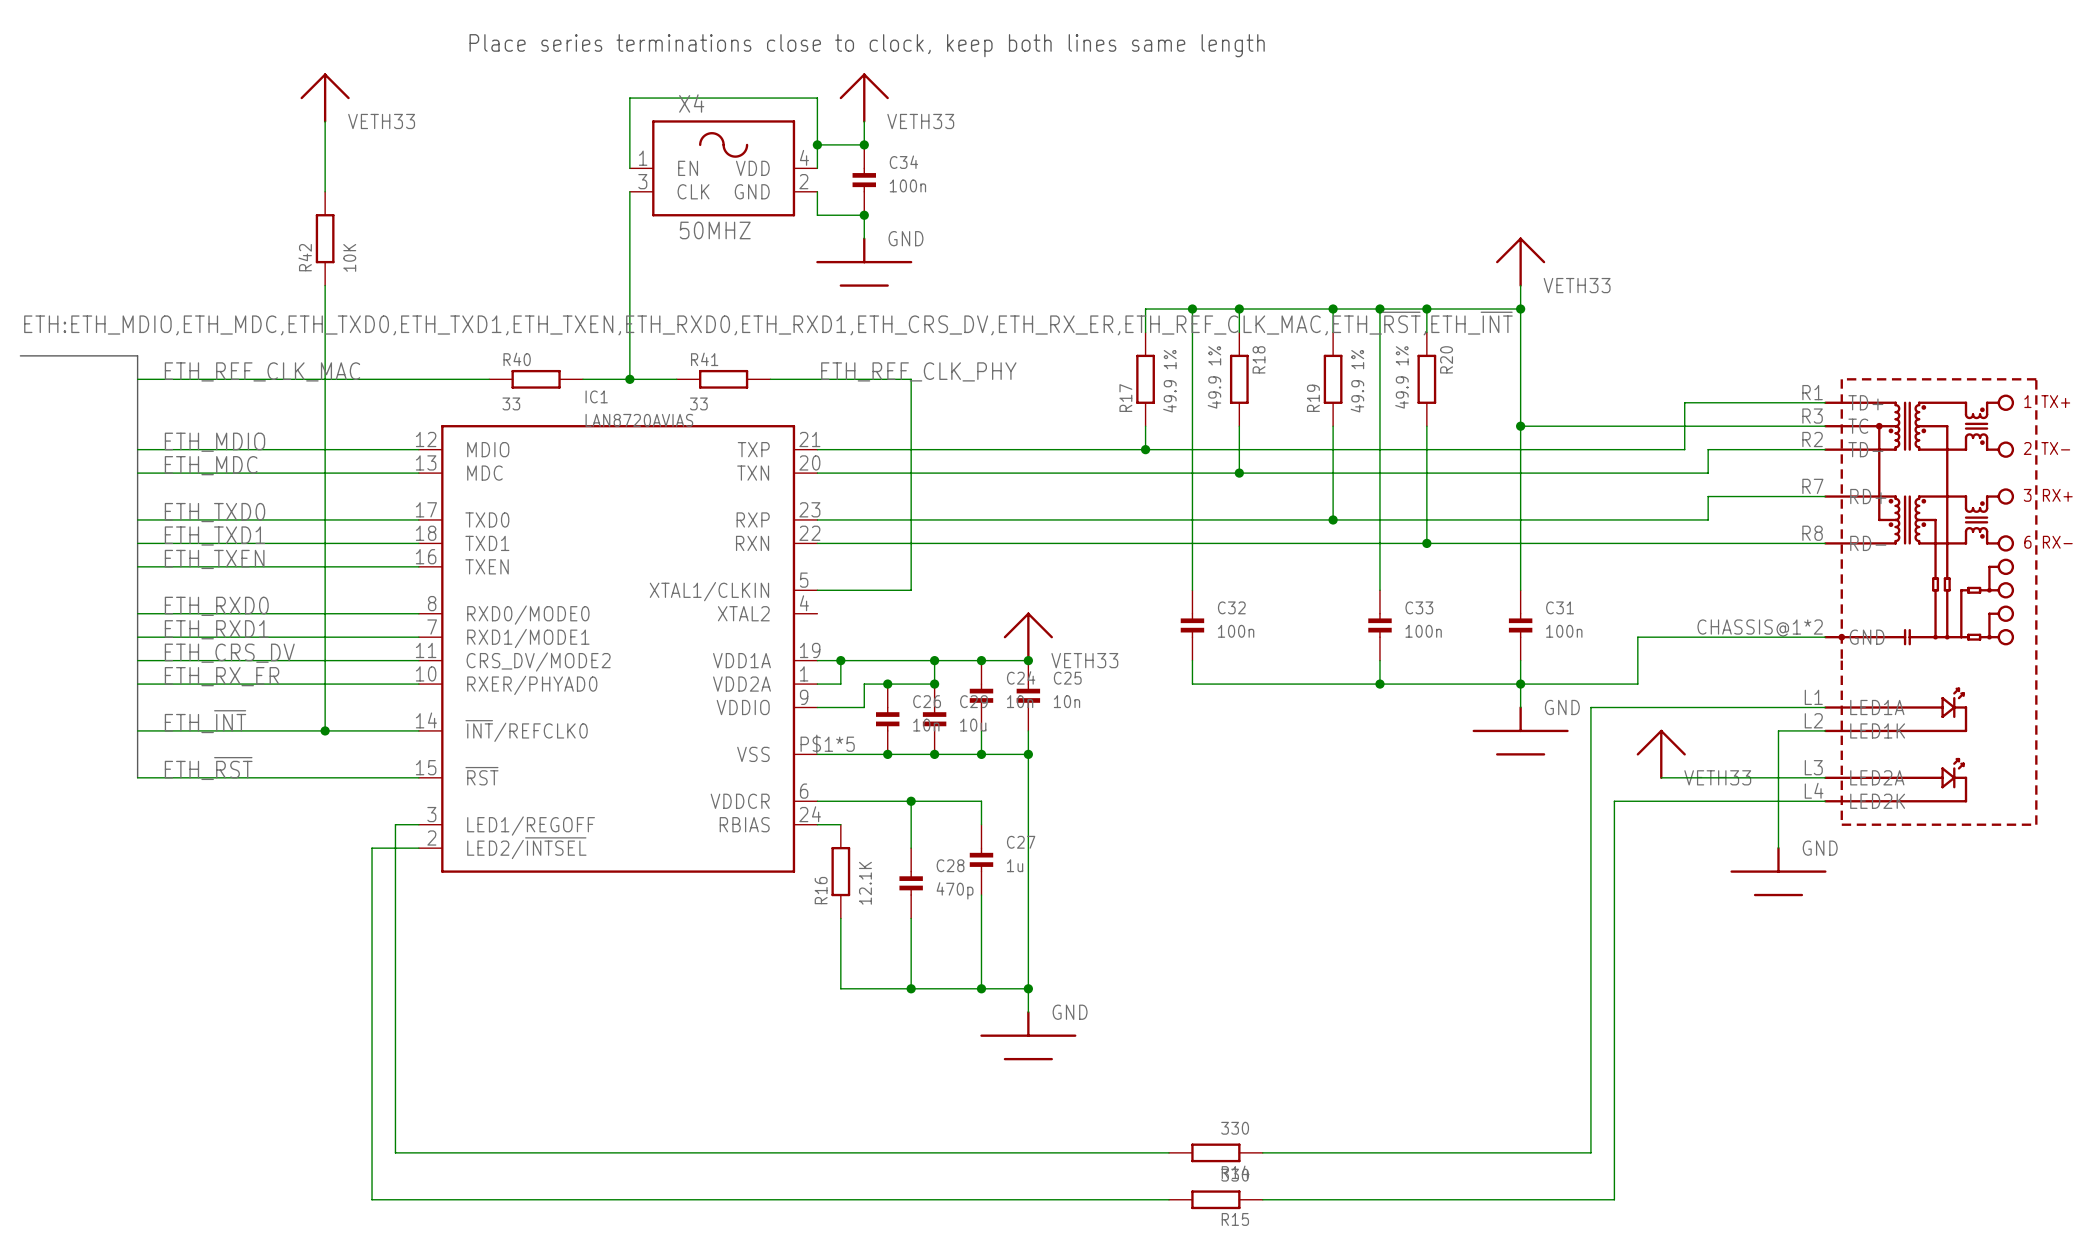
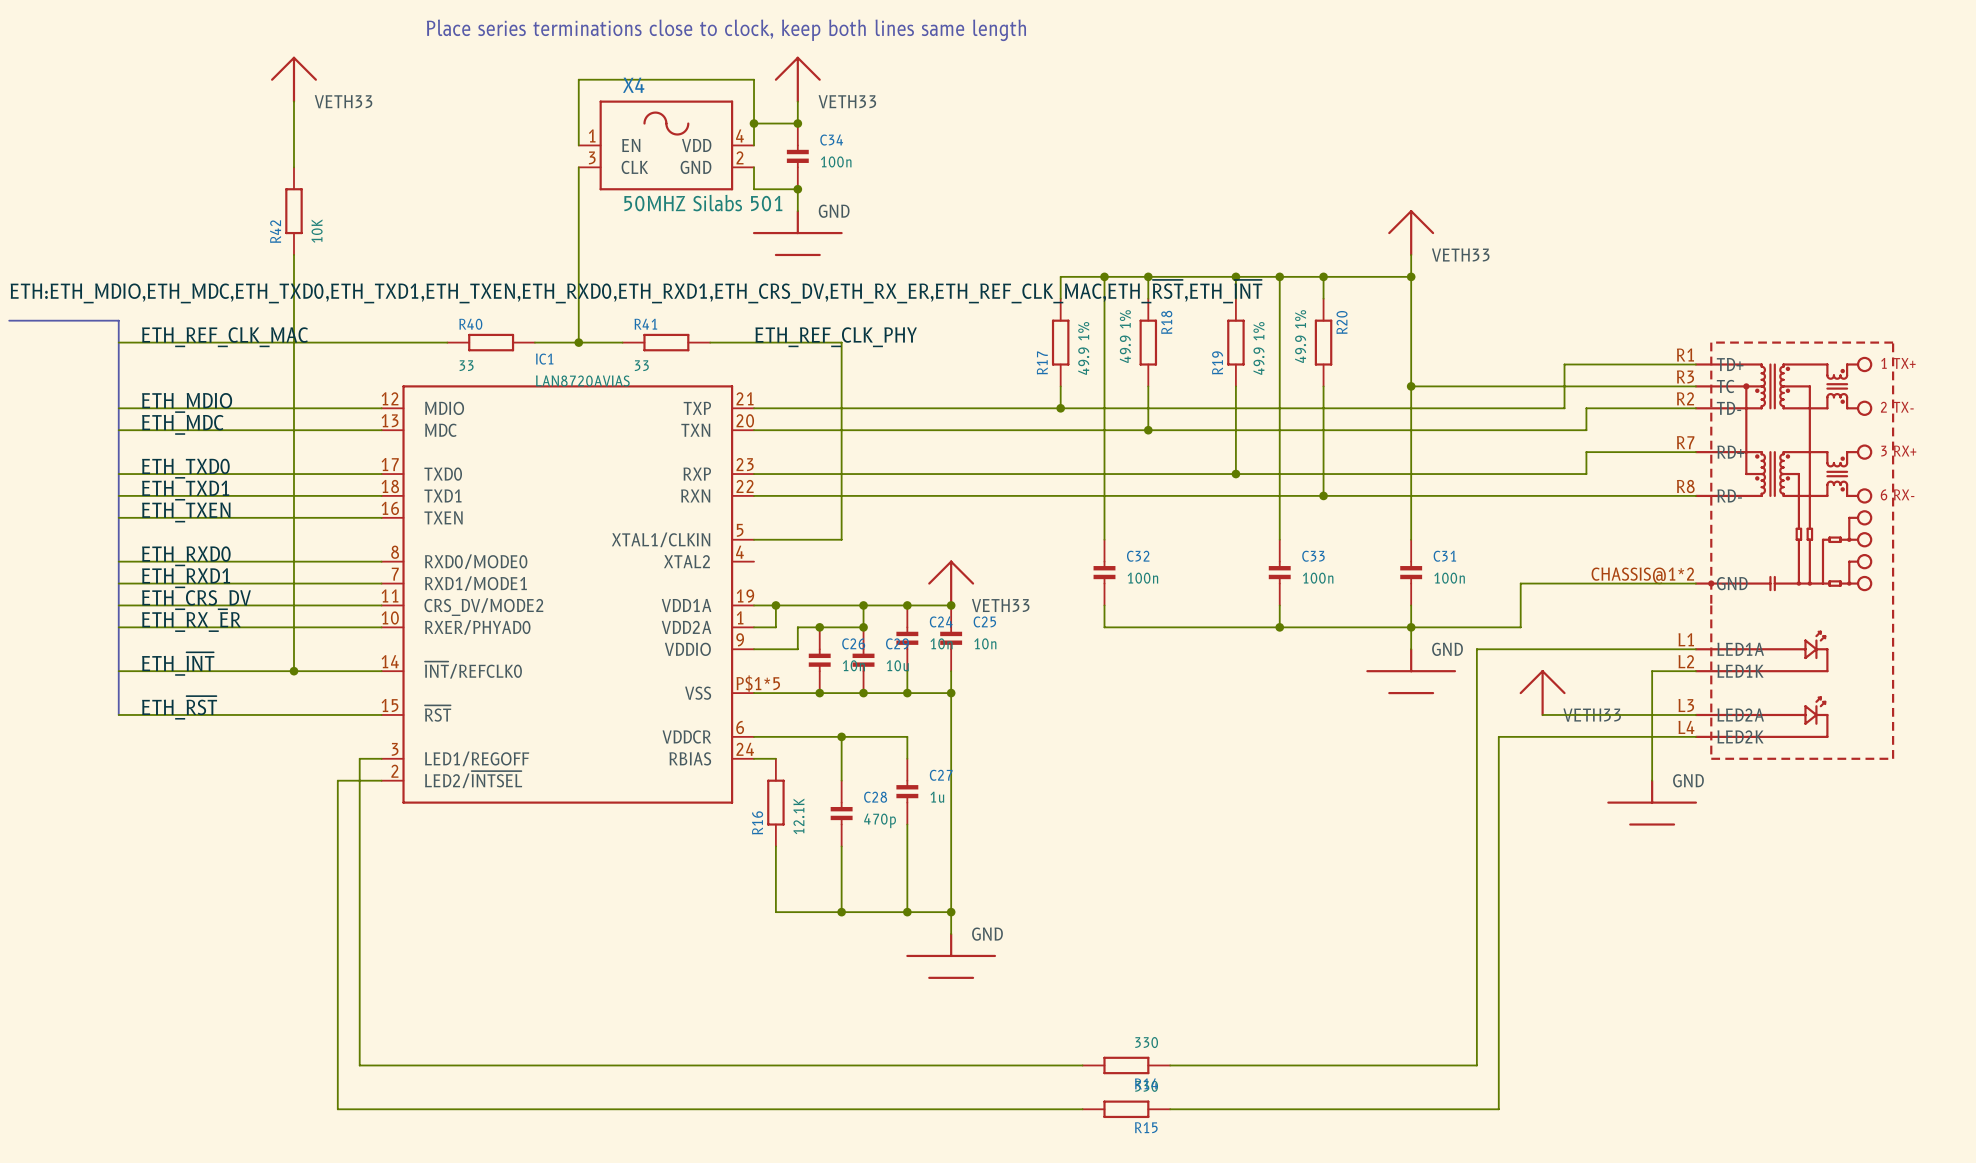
X4 value: 50MHZ (715, 230) -> 50MHZ Silabs 501 (703, 203)

